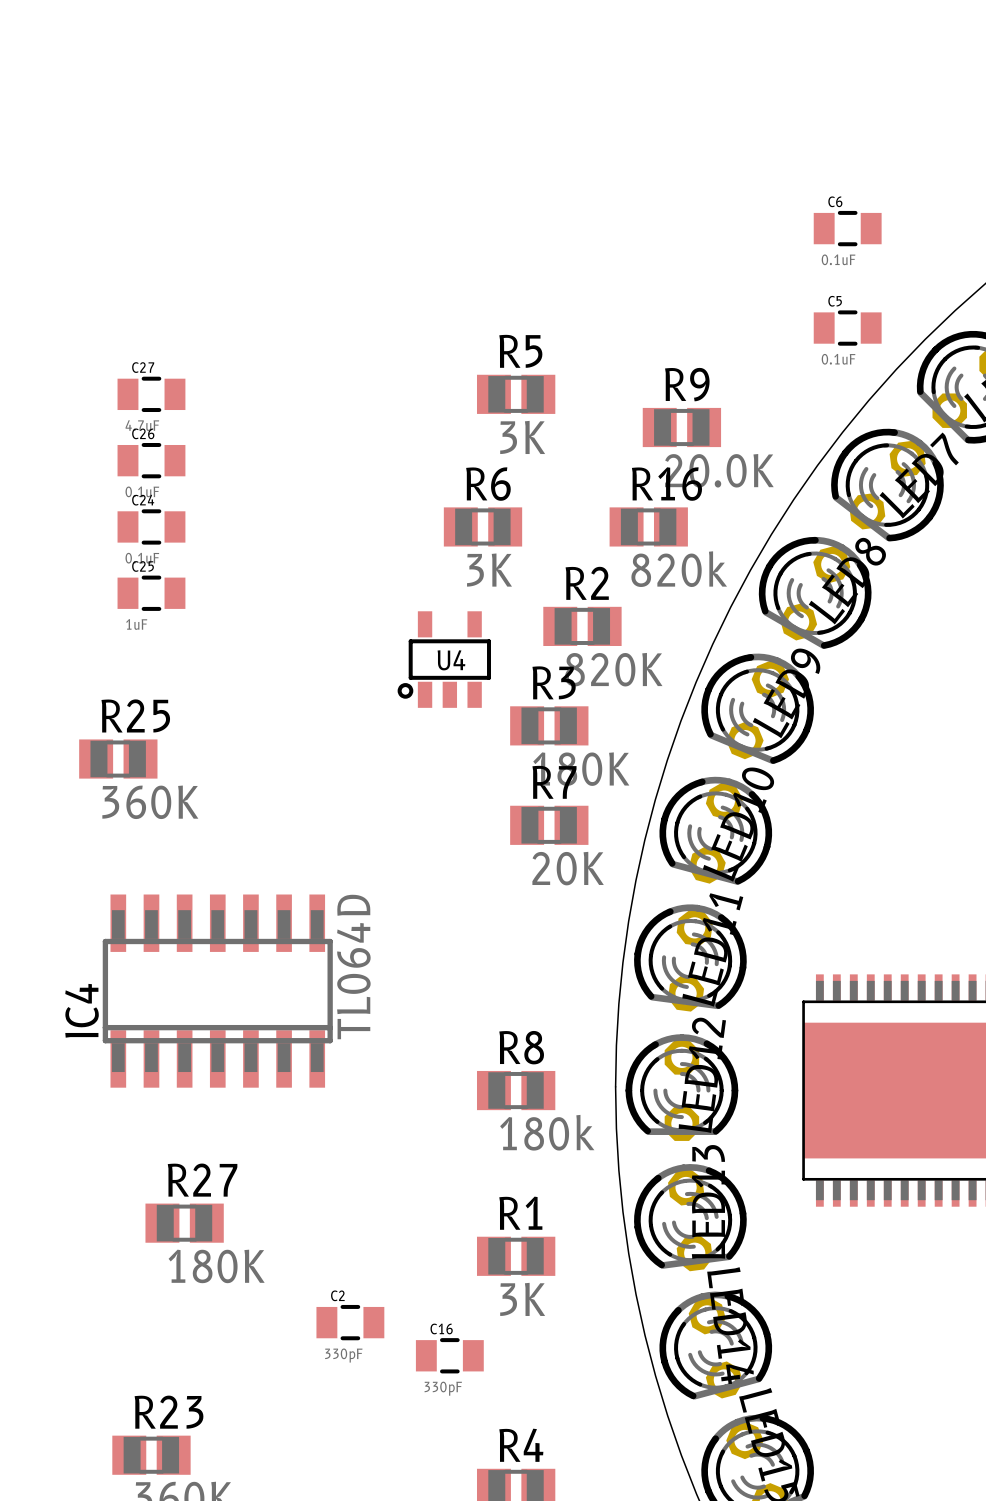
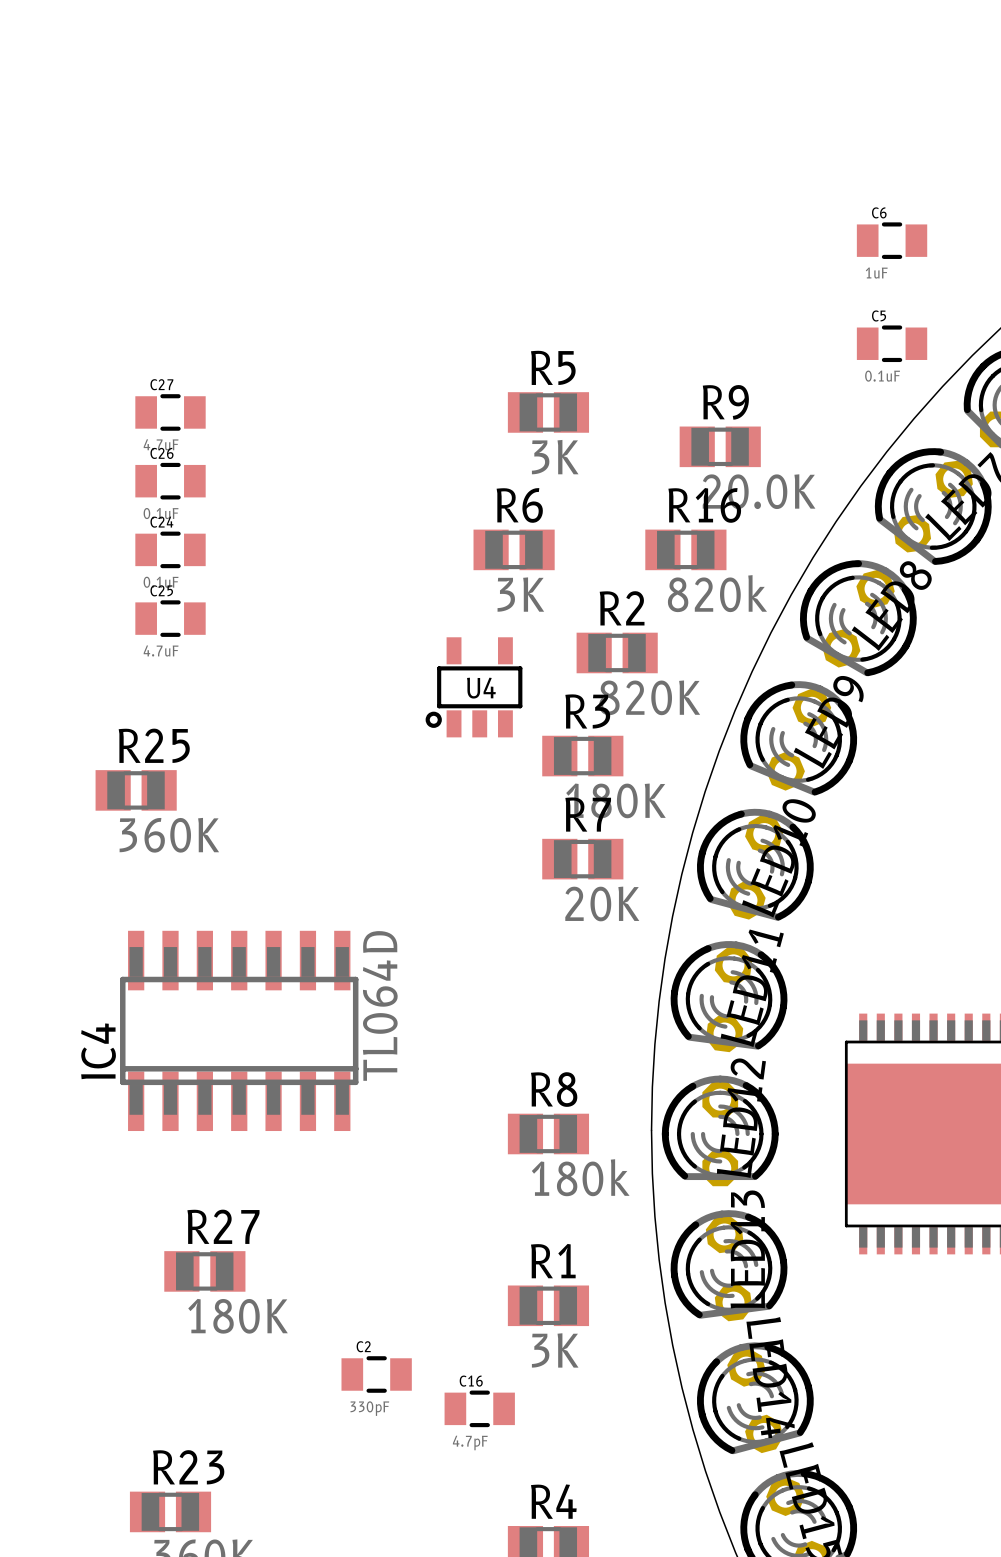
C6 value: 0.1uF (838, 259) -> 1uF (876, 273)
C25 value: 1uF (136, 624) -> 4.7uF (161, 650)
C16 value: 330pF (443, 1388) -> 4.7pF (470, 1442)

